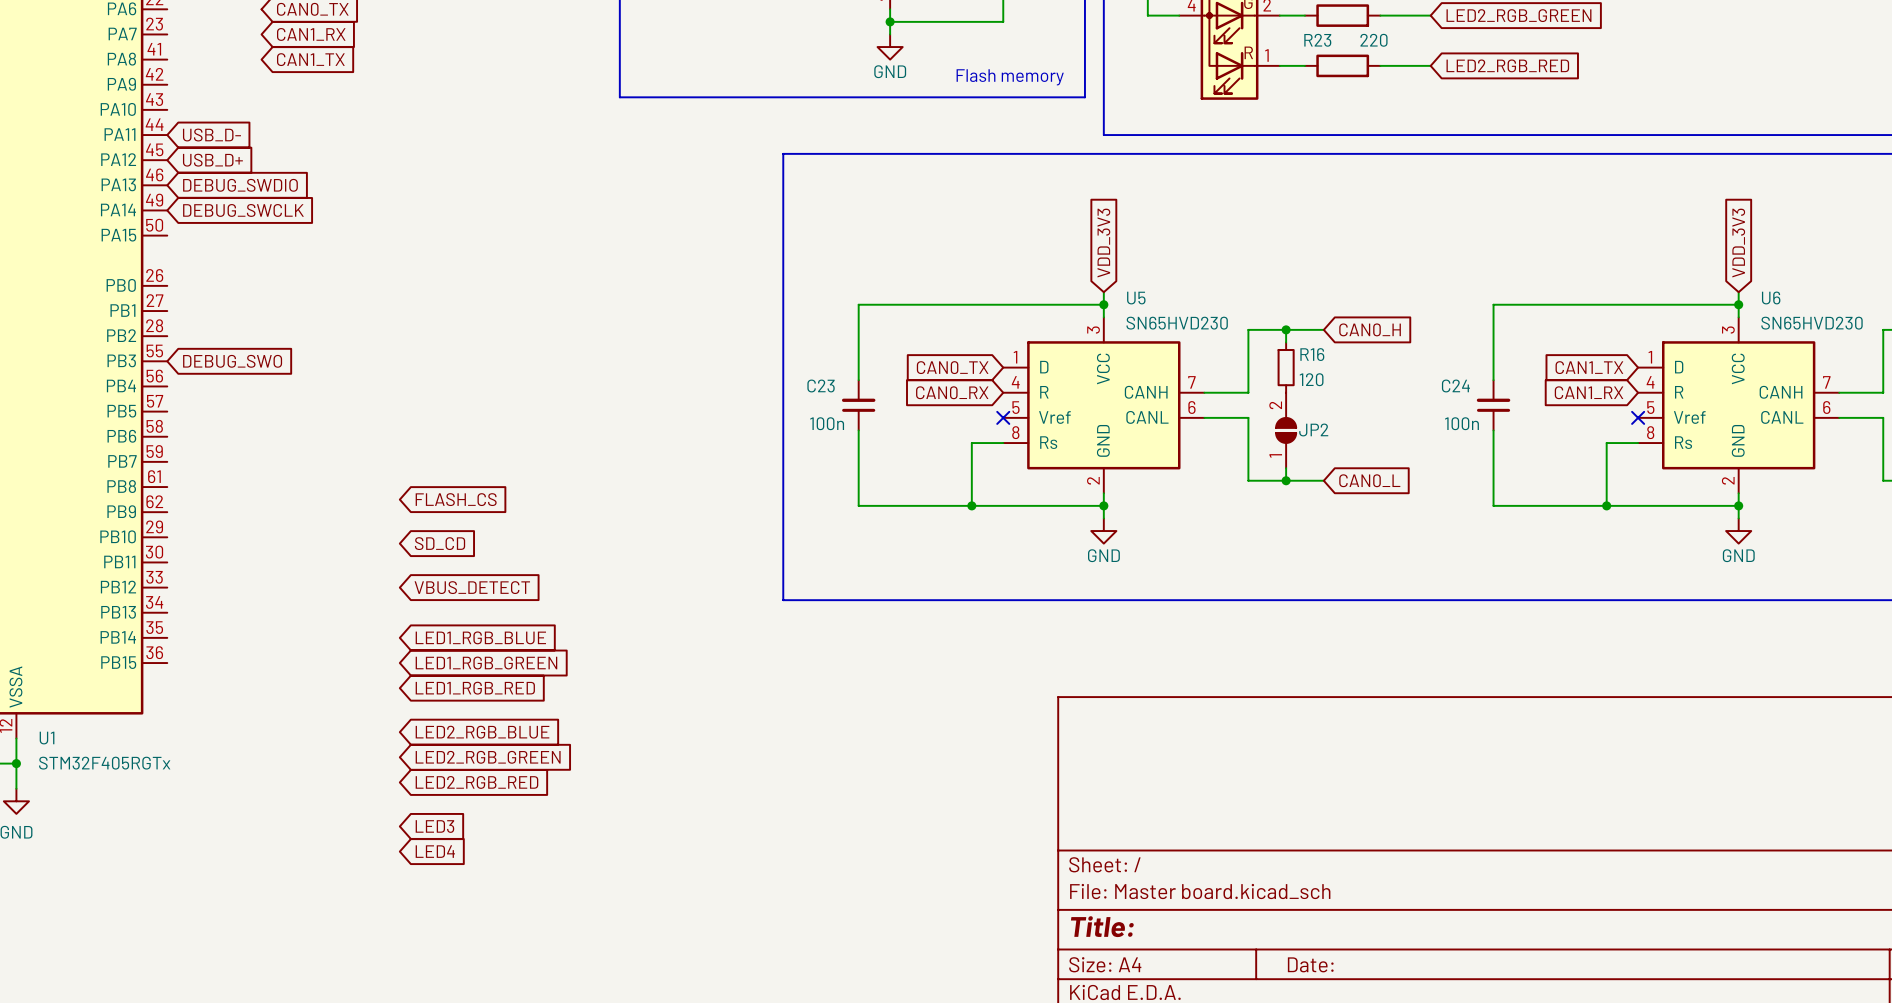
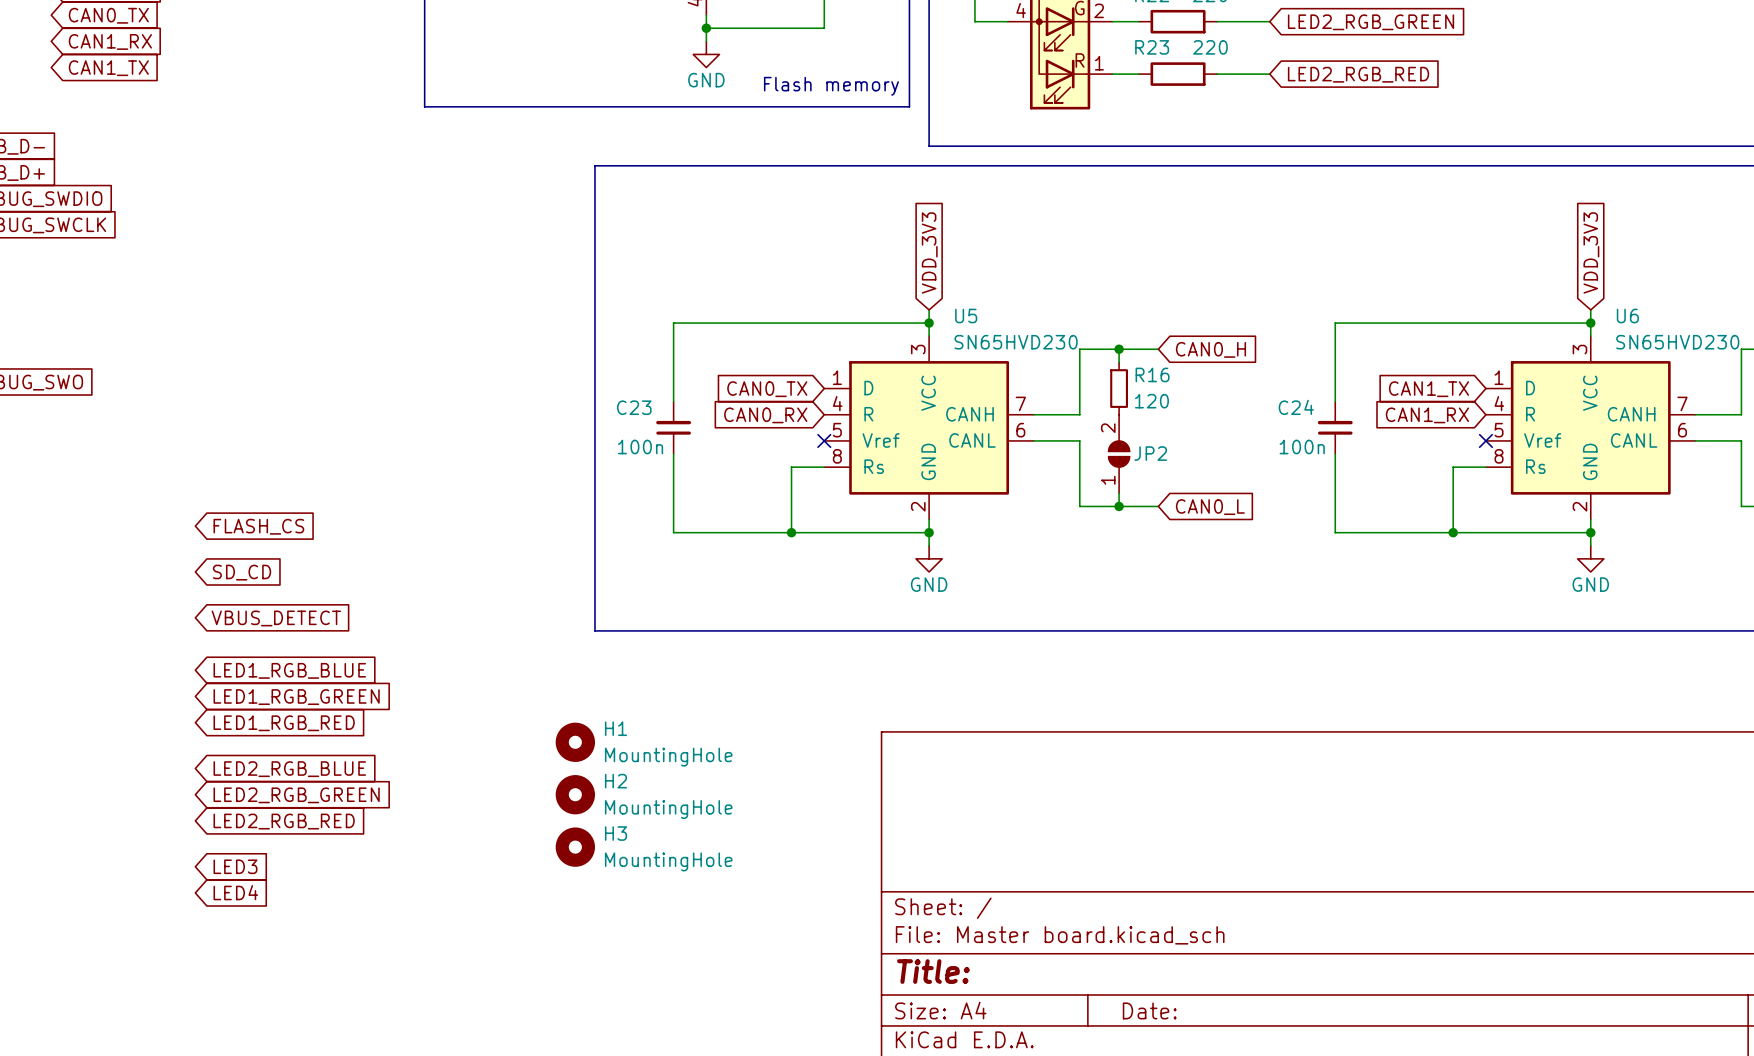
H1: none -> MountingHole (575, 742)
H2: none -> MountingHole (575, 794)
H3: none -> MountingHole (575, 847)

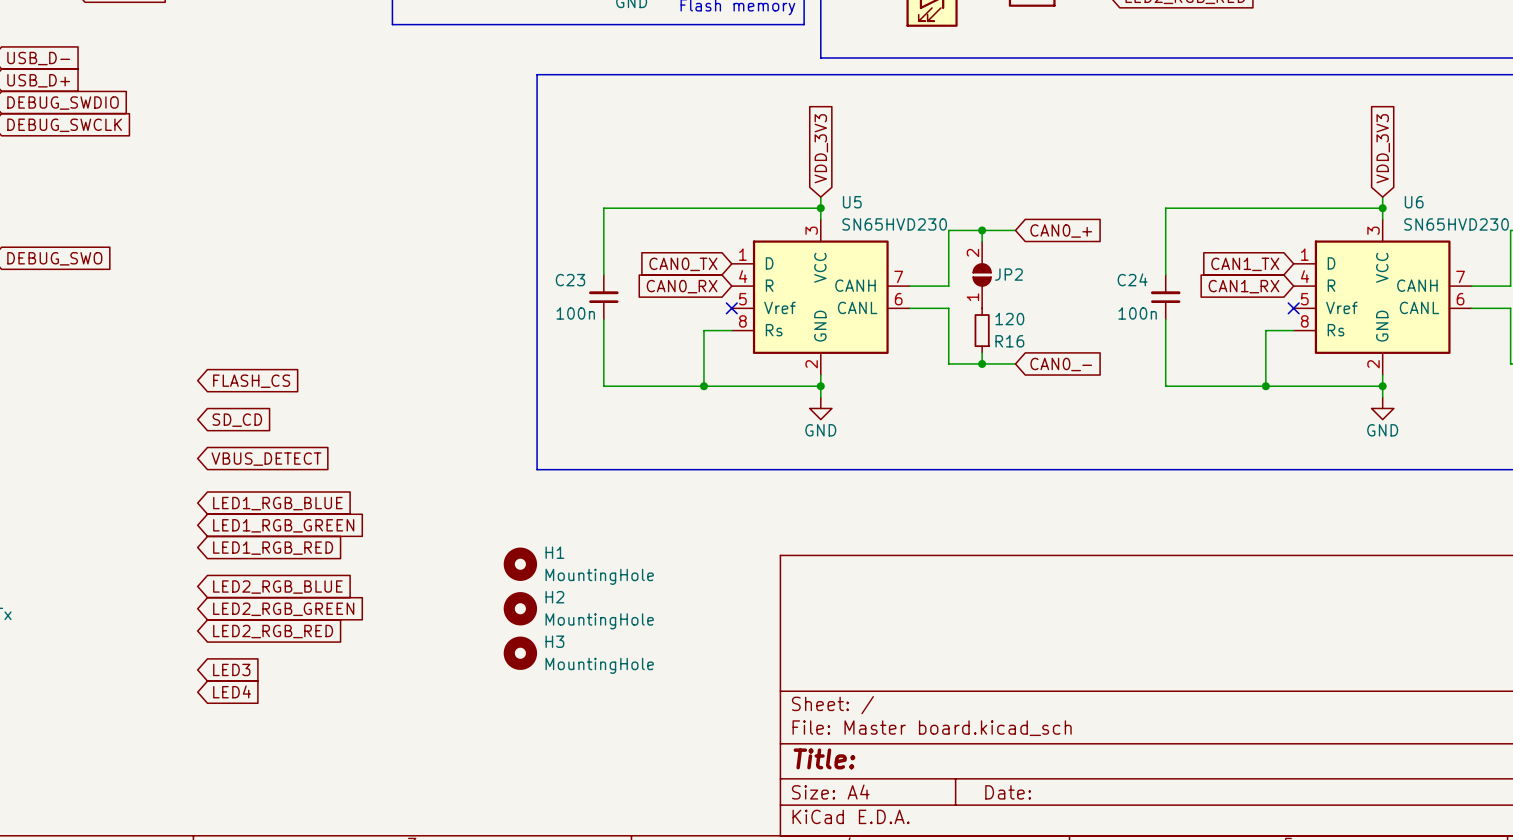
global label: CAN0_H (1210, 349) -> CAN0_+ (1061, 230)
R16 name position: R16 (1152, 374) -> R16 (1009, 341)
R16 position: (1119, 388) -> (982, 330)
R16 value position: 120 (1151, 401) -> 120 (1009, 319)
JP2 position: (1119, 454) -> (982, 274)
global label: CAN0_L (1210, 507) -> CAN0_- (1061, 364)

